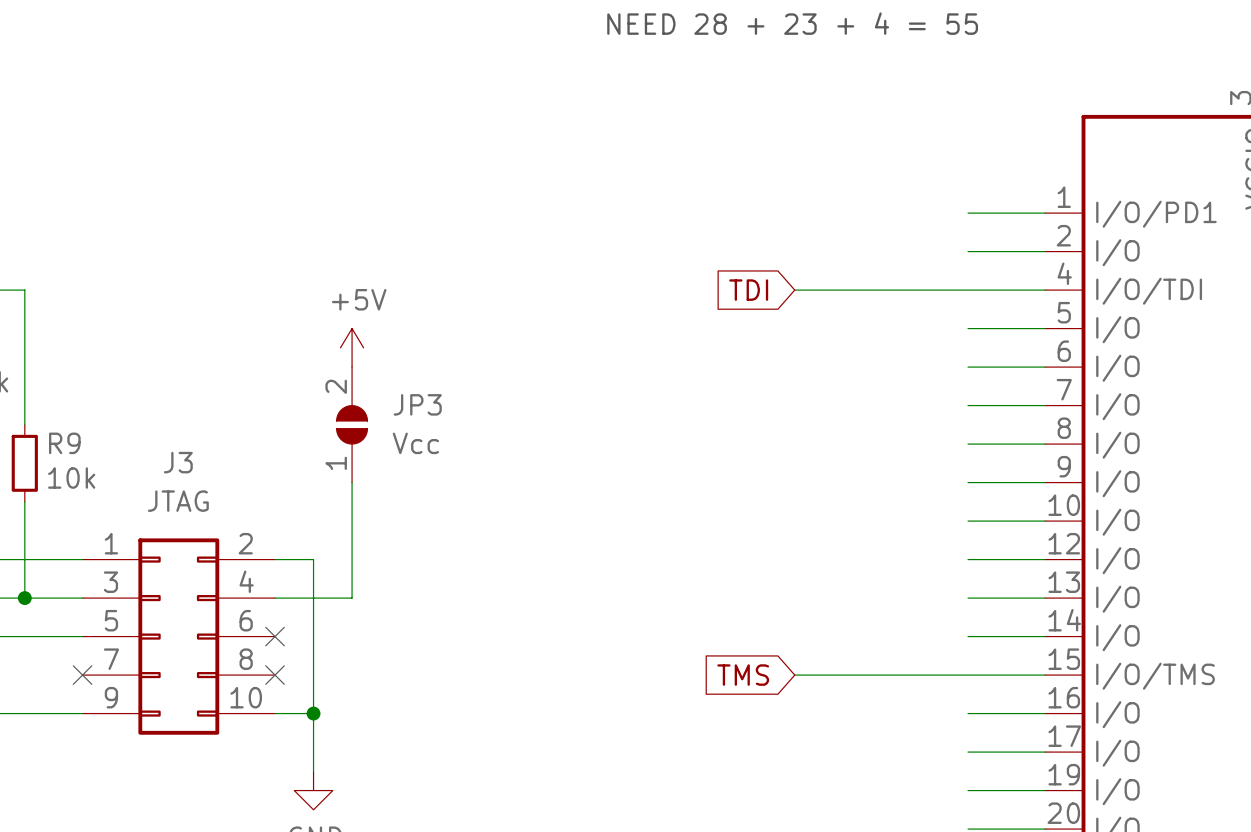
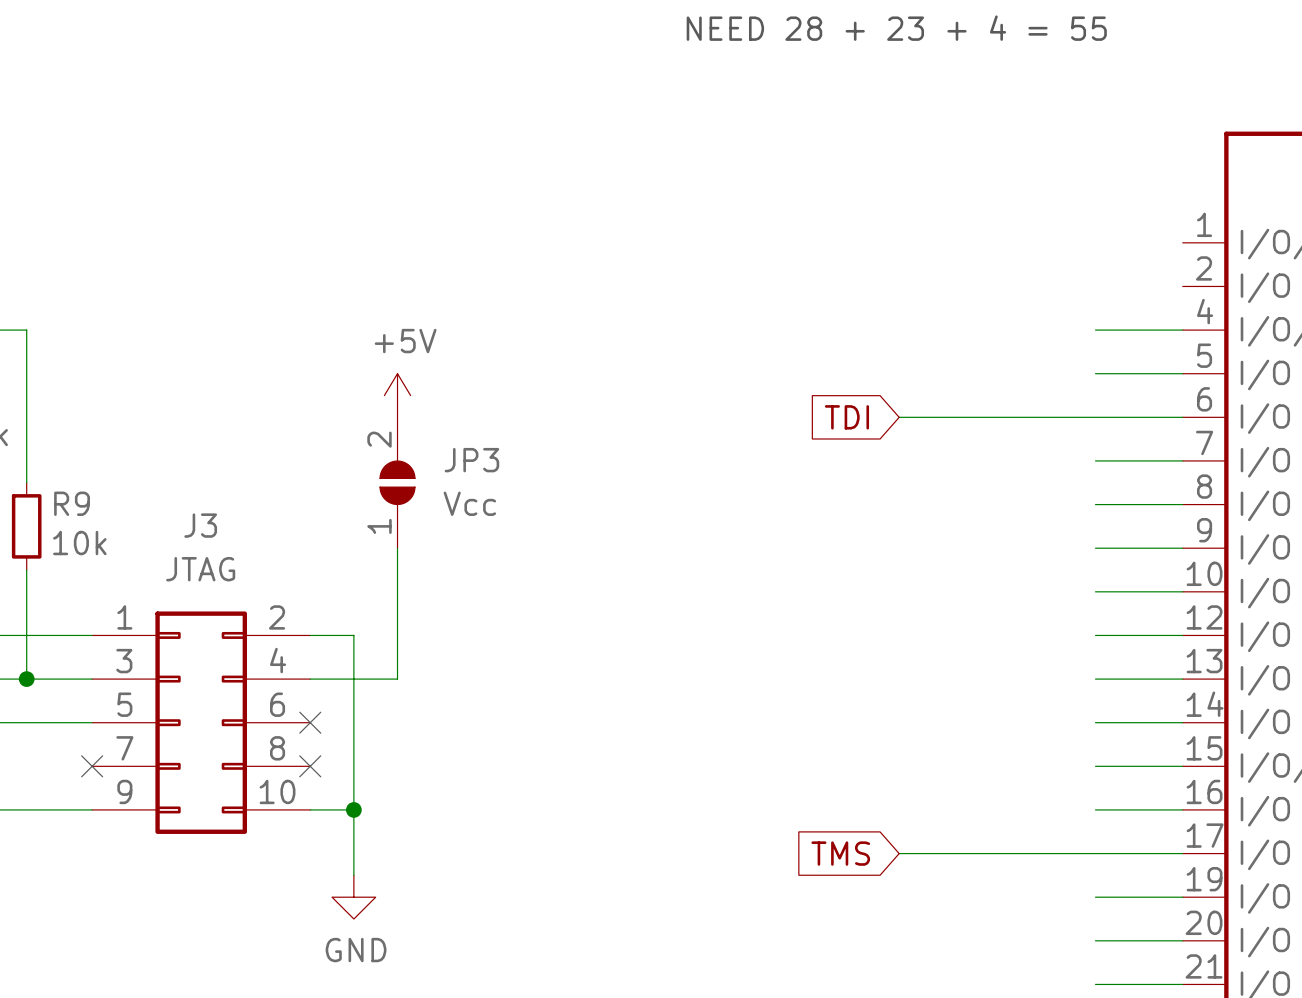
wire: (968, 213) (1045, 213) -> none
wire: (968, 251) (1045, 251) -> none
global label position: TDI (748, 290) -> TDI (846, 417)
wire: (794, 290) (968, 290) -> (899, 417) (1095, 417)
global label position: TMS (743, 675) -> TMS (840, 853)
wire: (794, 675) (968, 675) -> (899, 853) (1095, 853)

